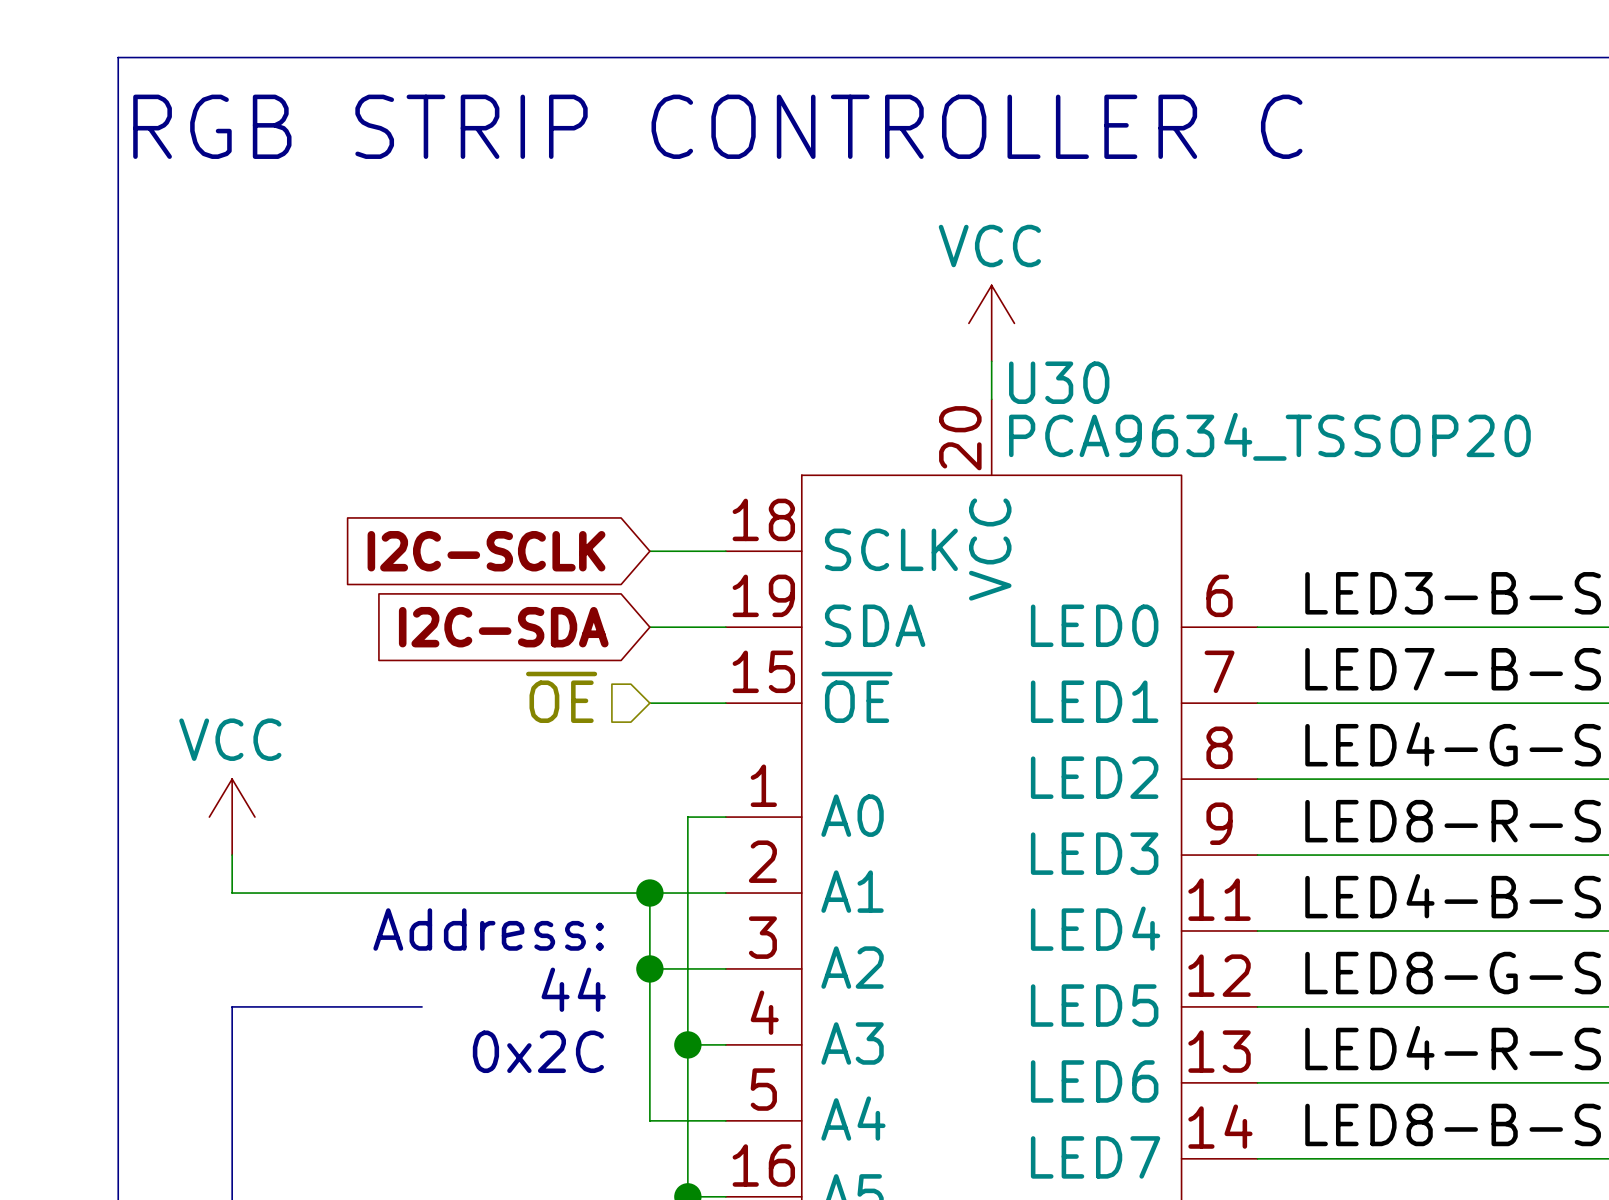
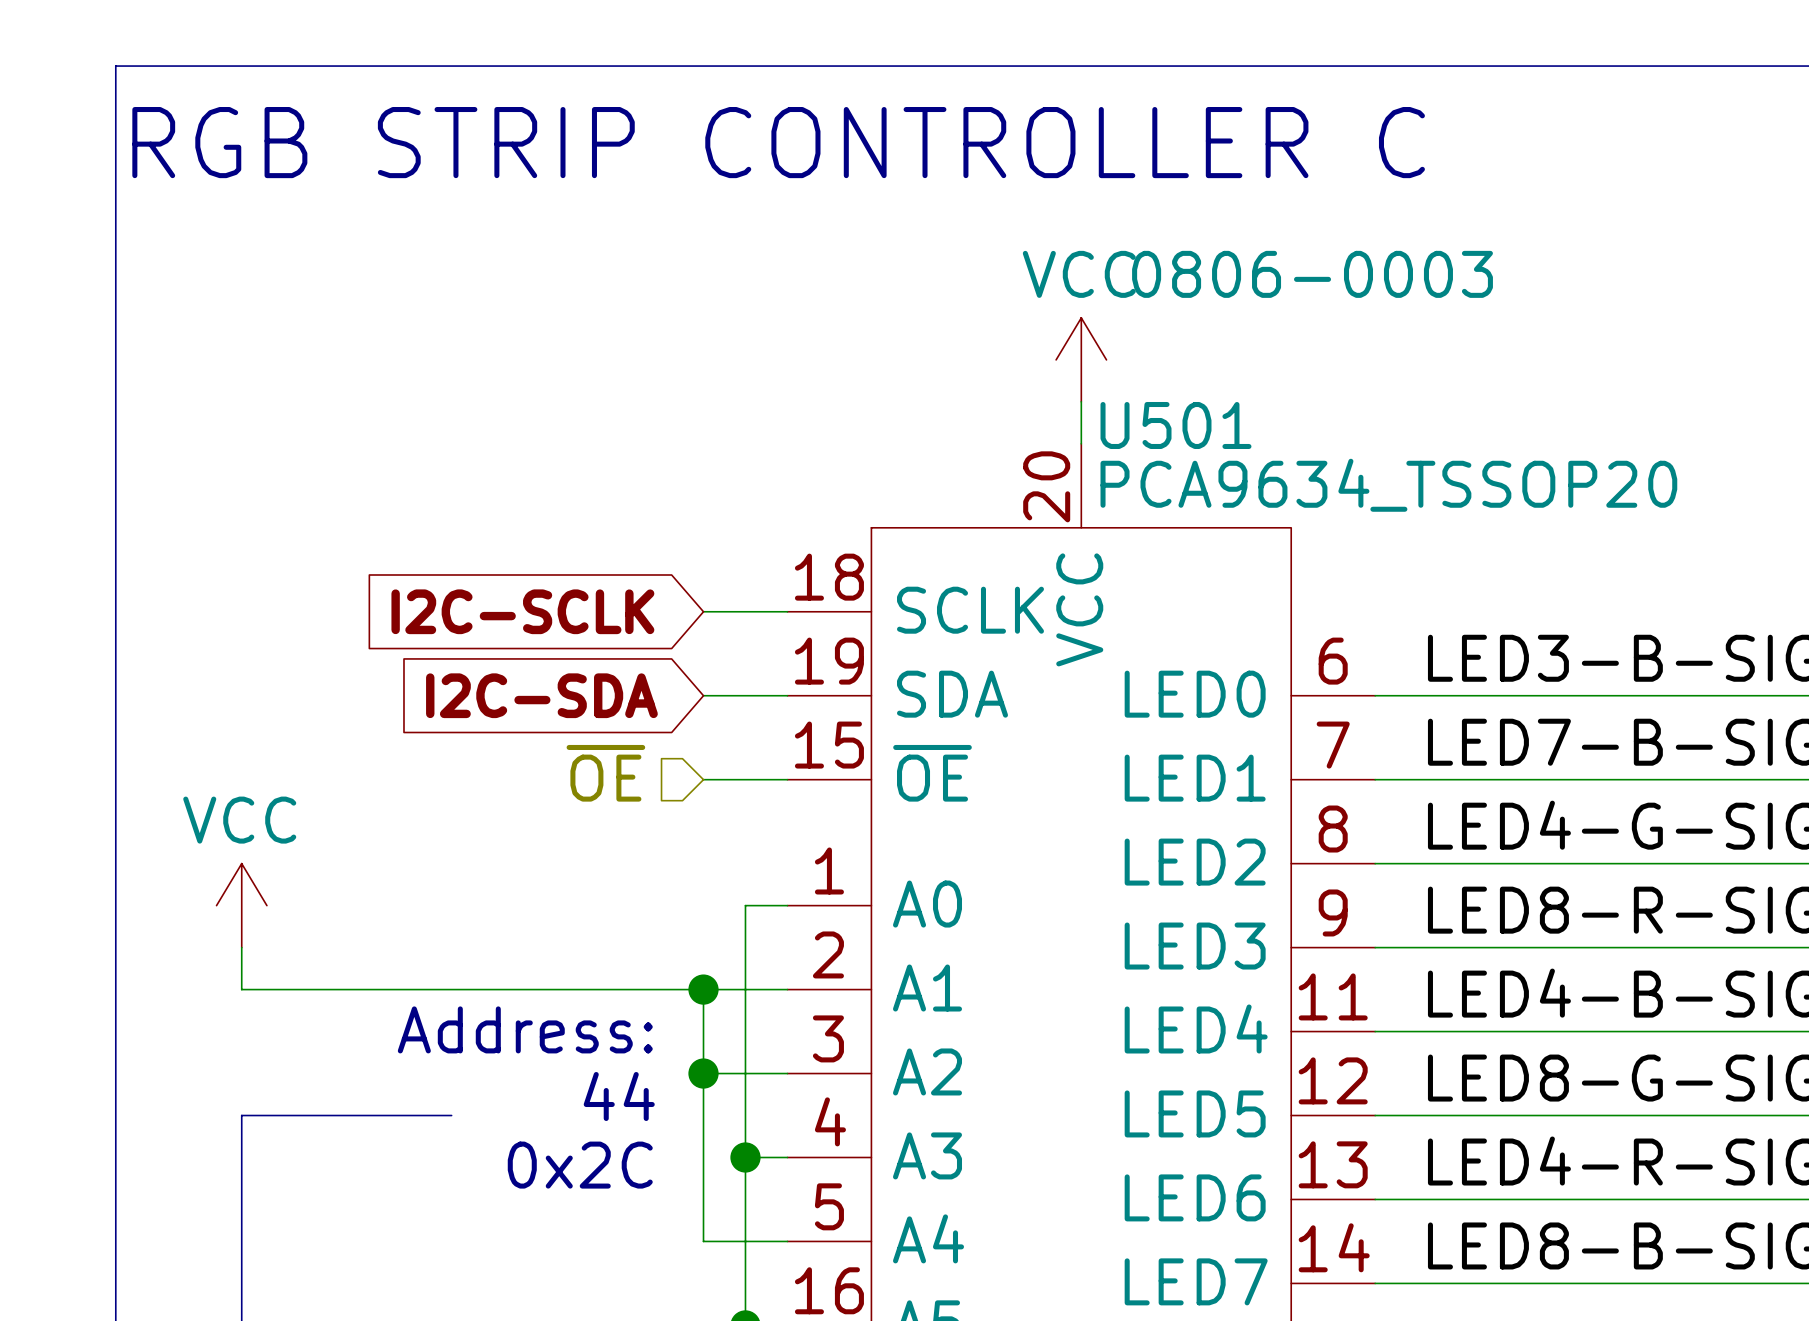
U30 text: none -> 0806-0003 (1312, 274)
U30 name: U30 (1059, 382) -> U501 (1175, 425)

